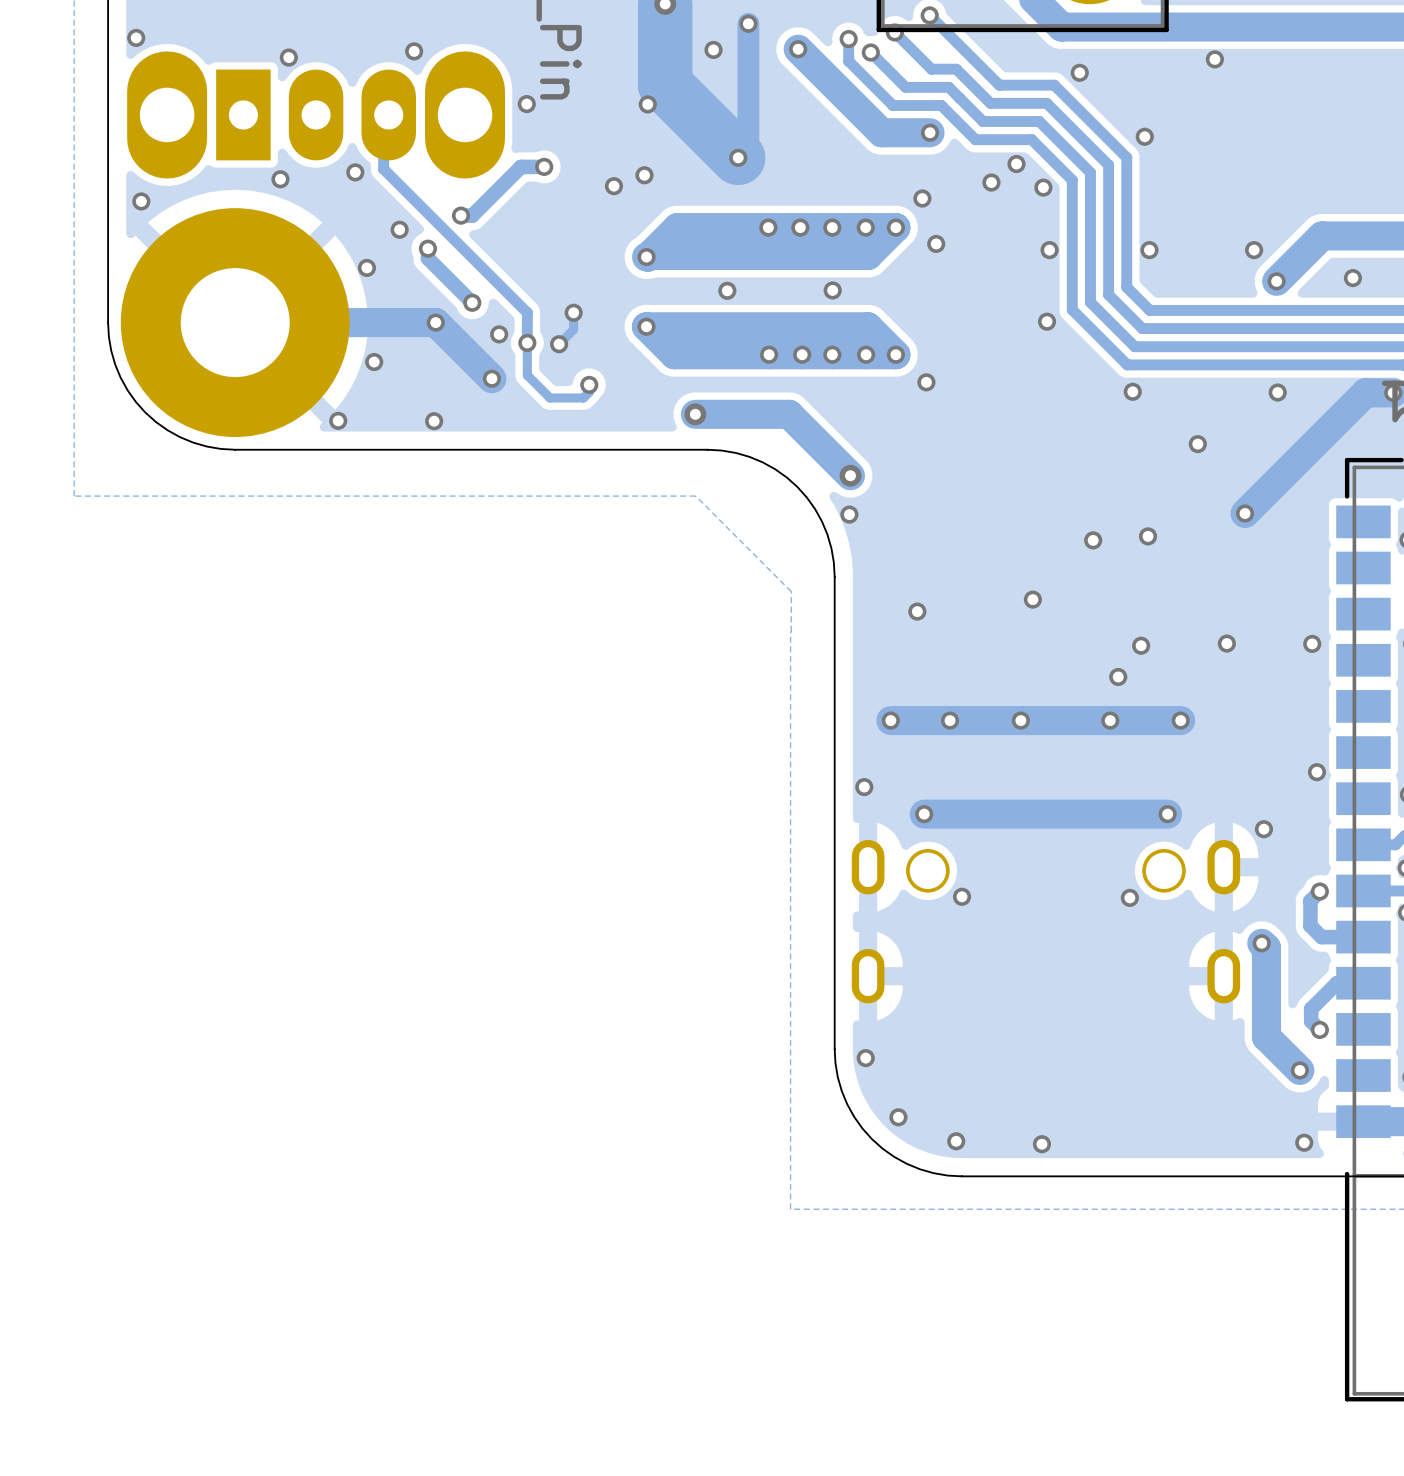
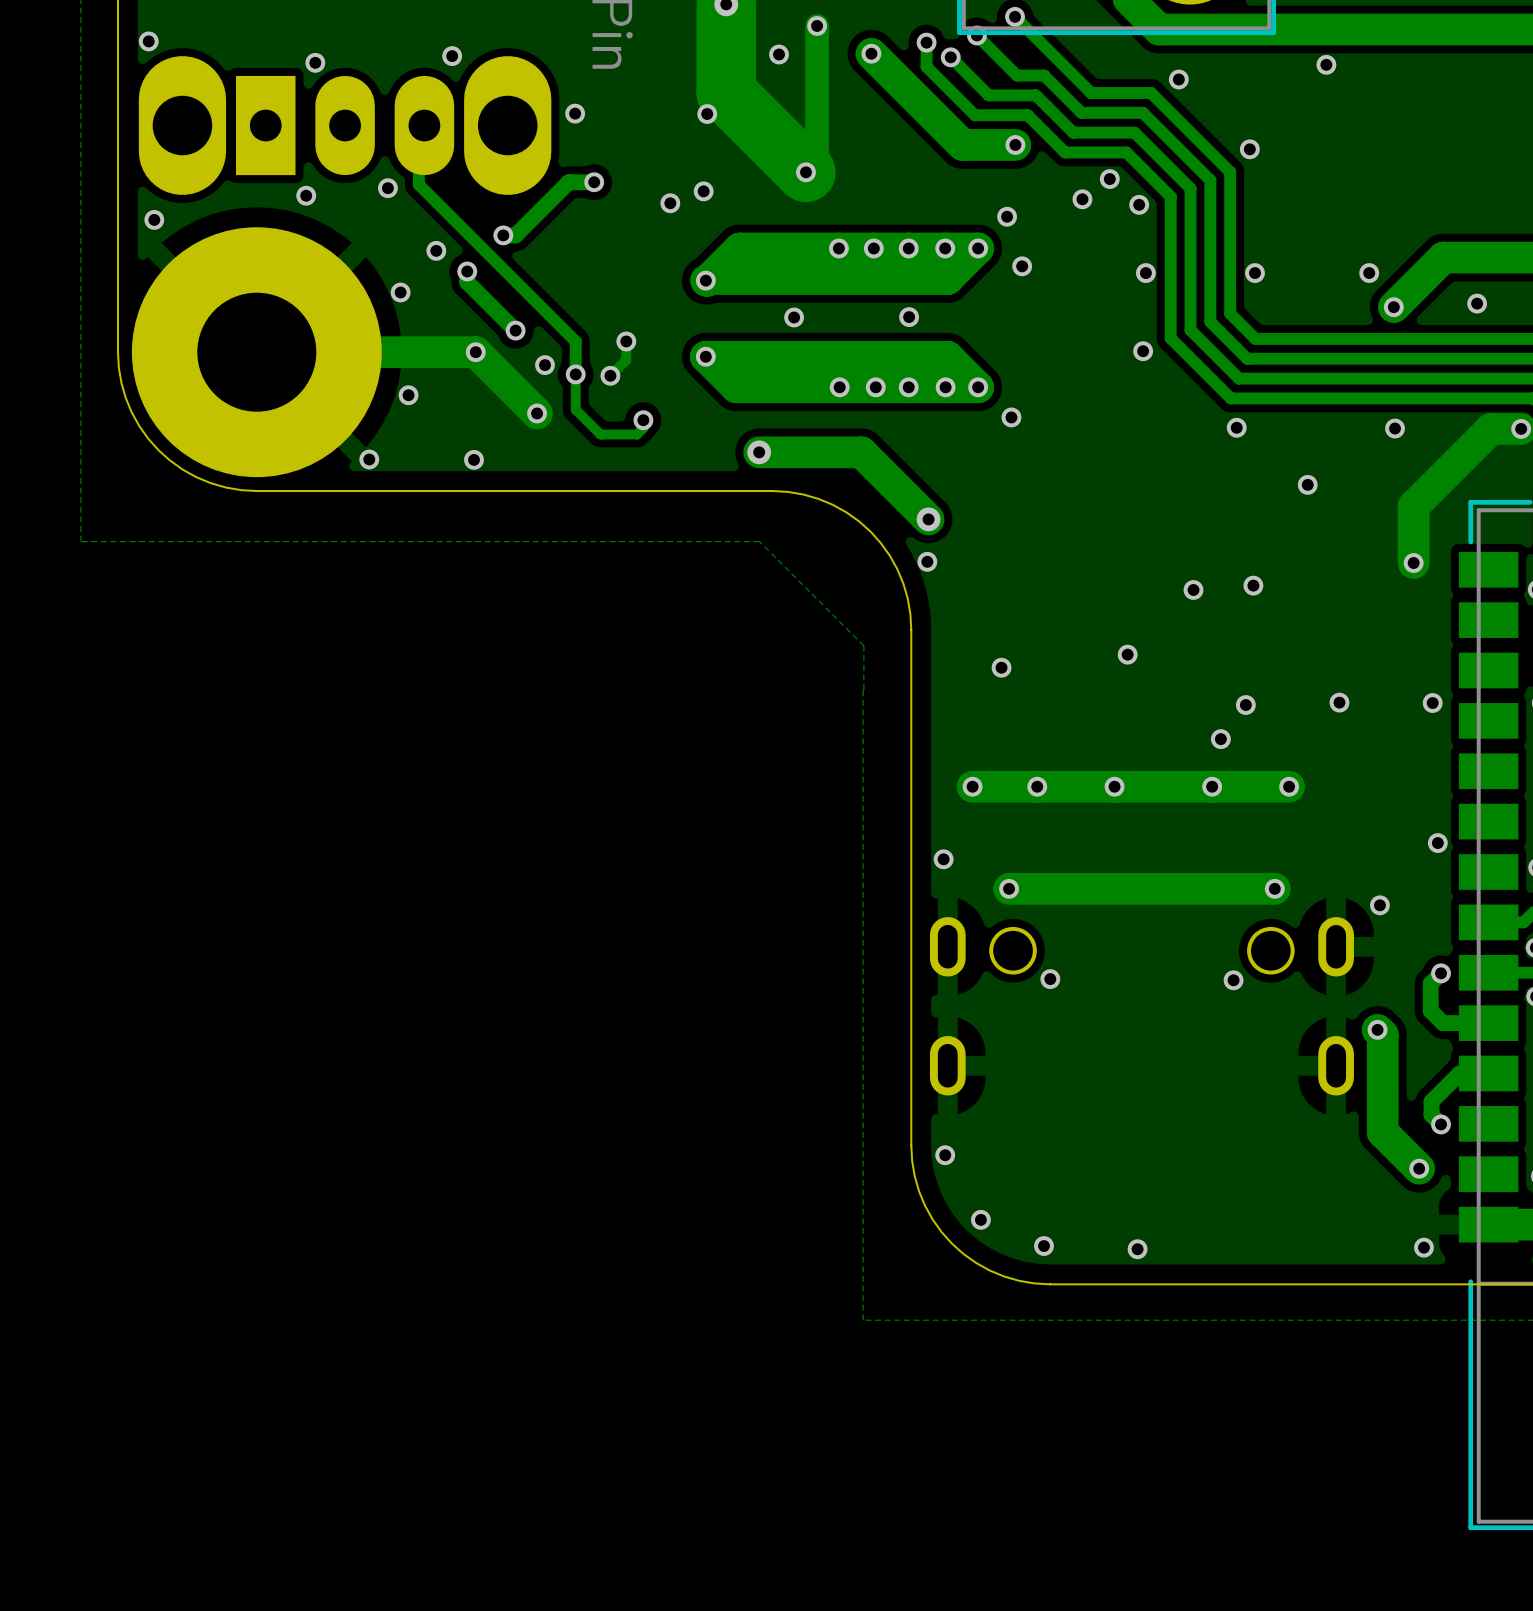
track: (1294, 463) (1245, 513) -> (1413, 506) (1413, 563)
via position: (1245, 513) -> (1413, 563)

